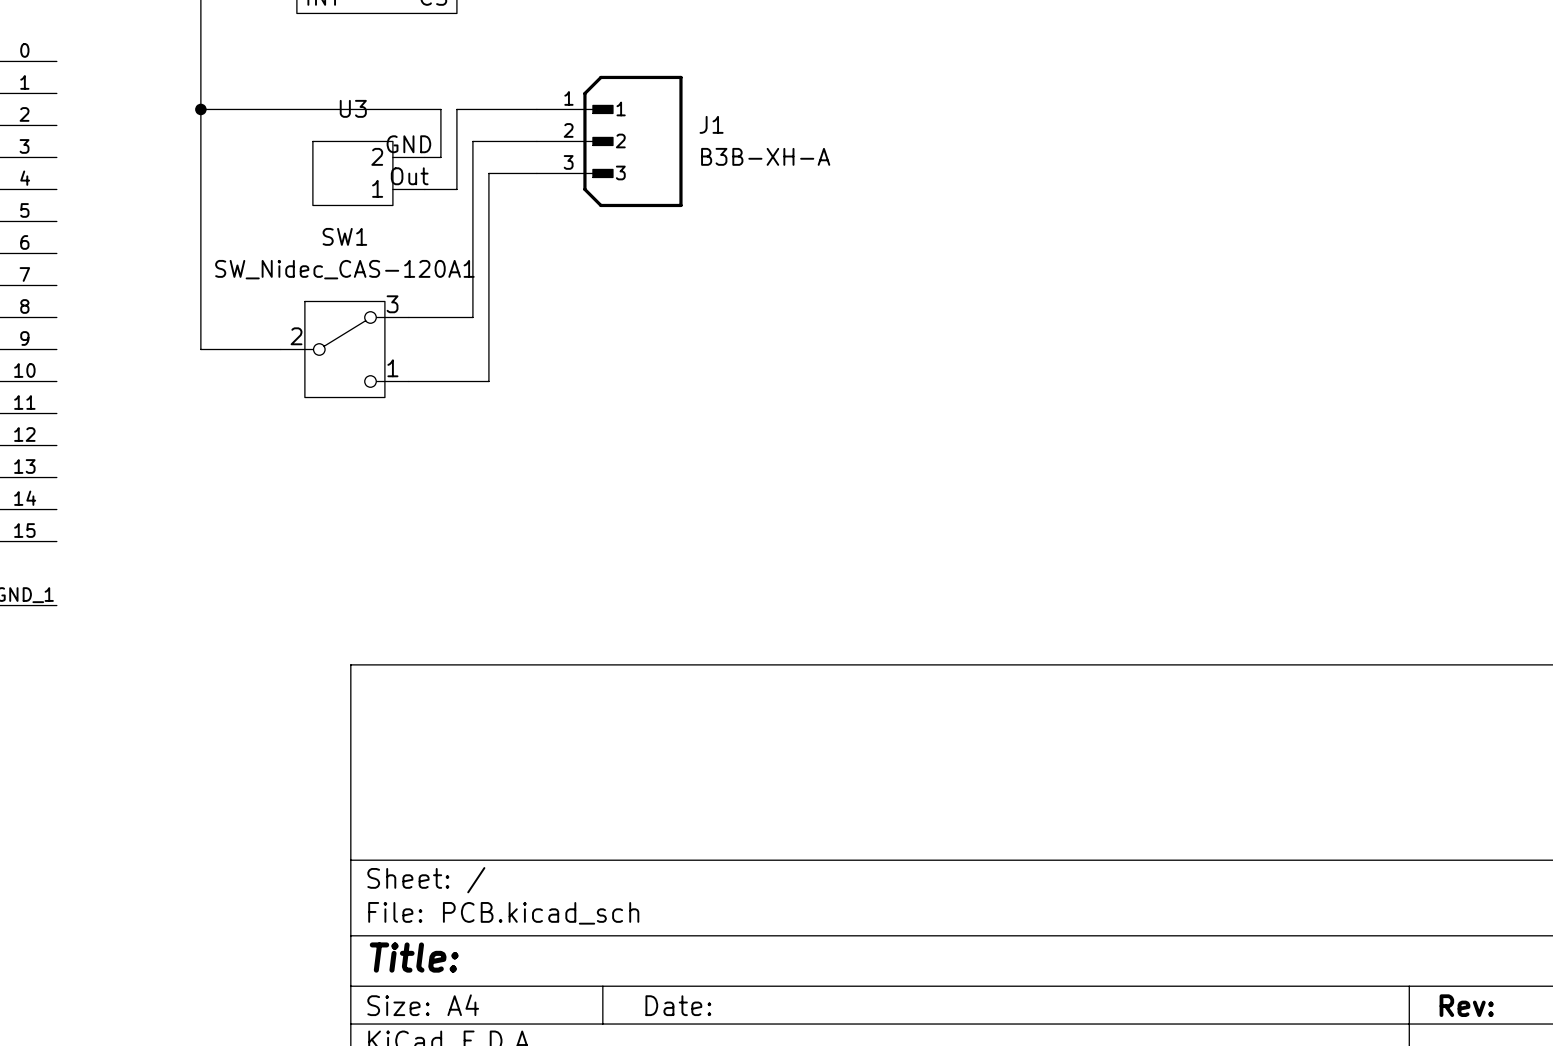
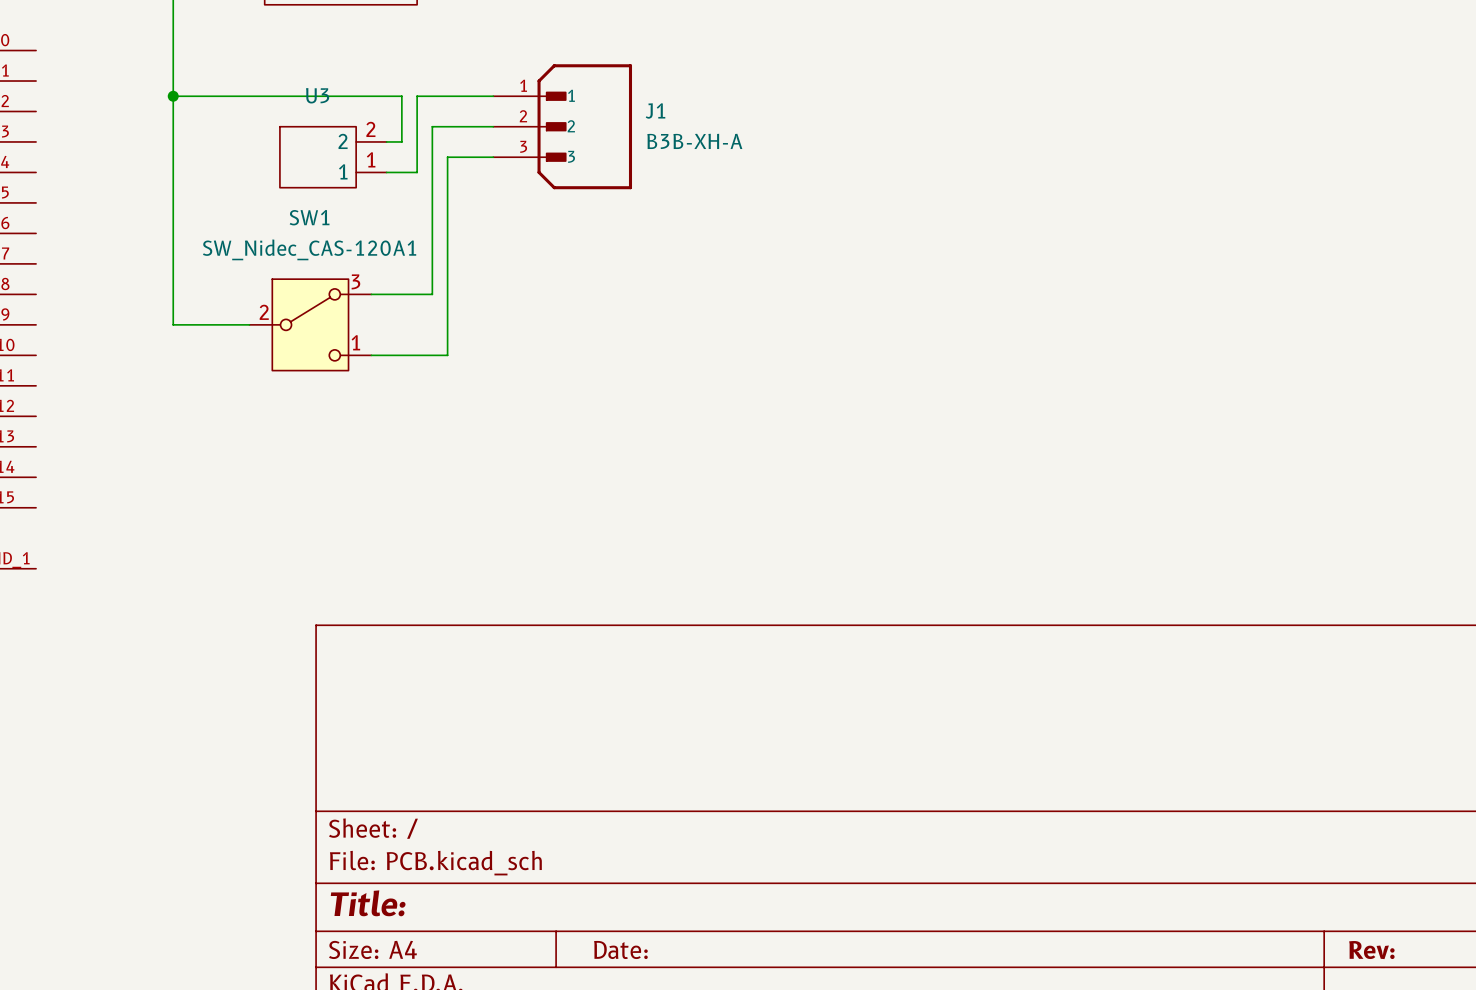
U3 pin number: GND (408, 144) -> 2 (370, 129)
U3 pin number: Out (409, 176) -> 1 (371, 159)

